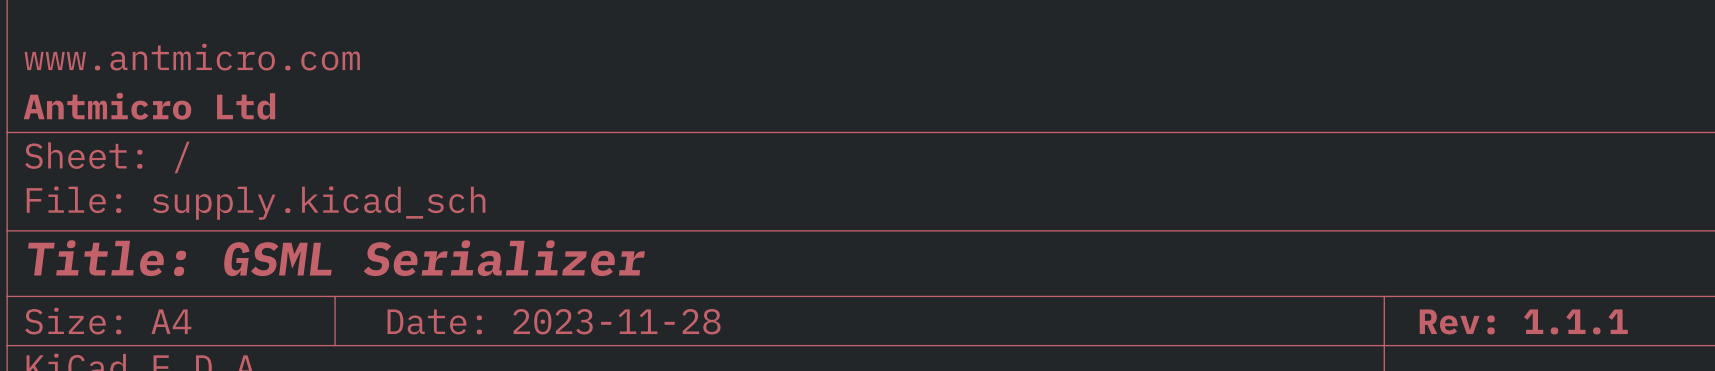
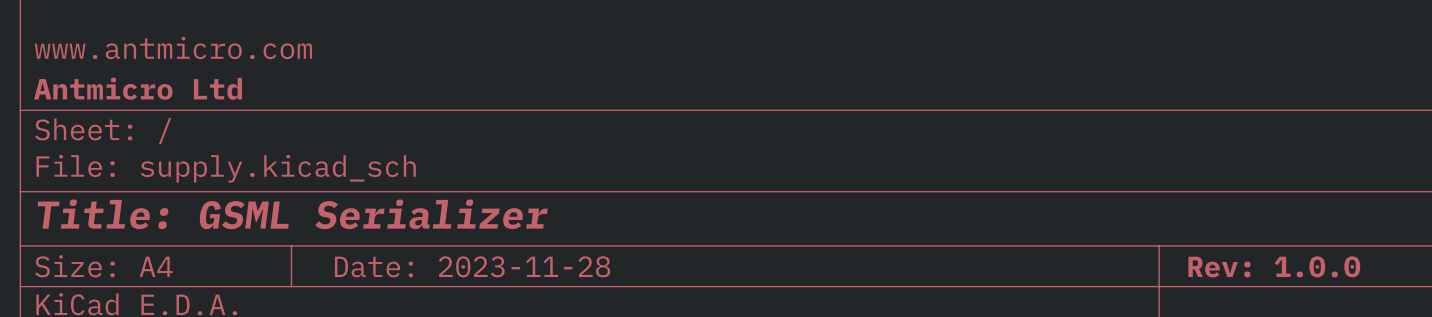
title block: Rev: 1.1.1 (1523, 321) -> Rev: 1.0.0 (1274, 266)

